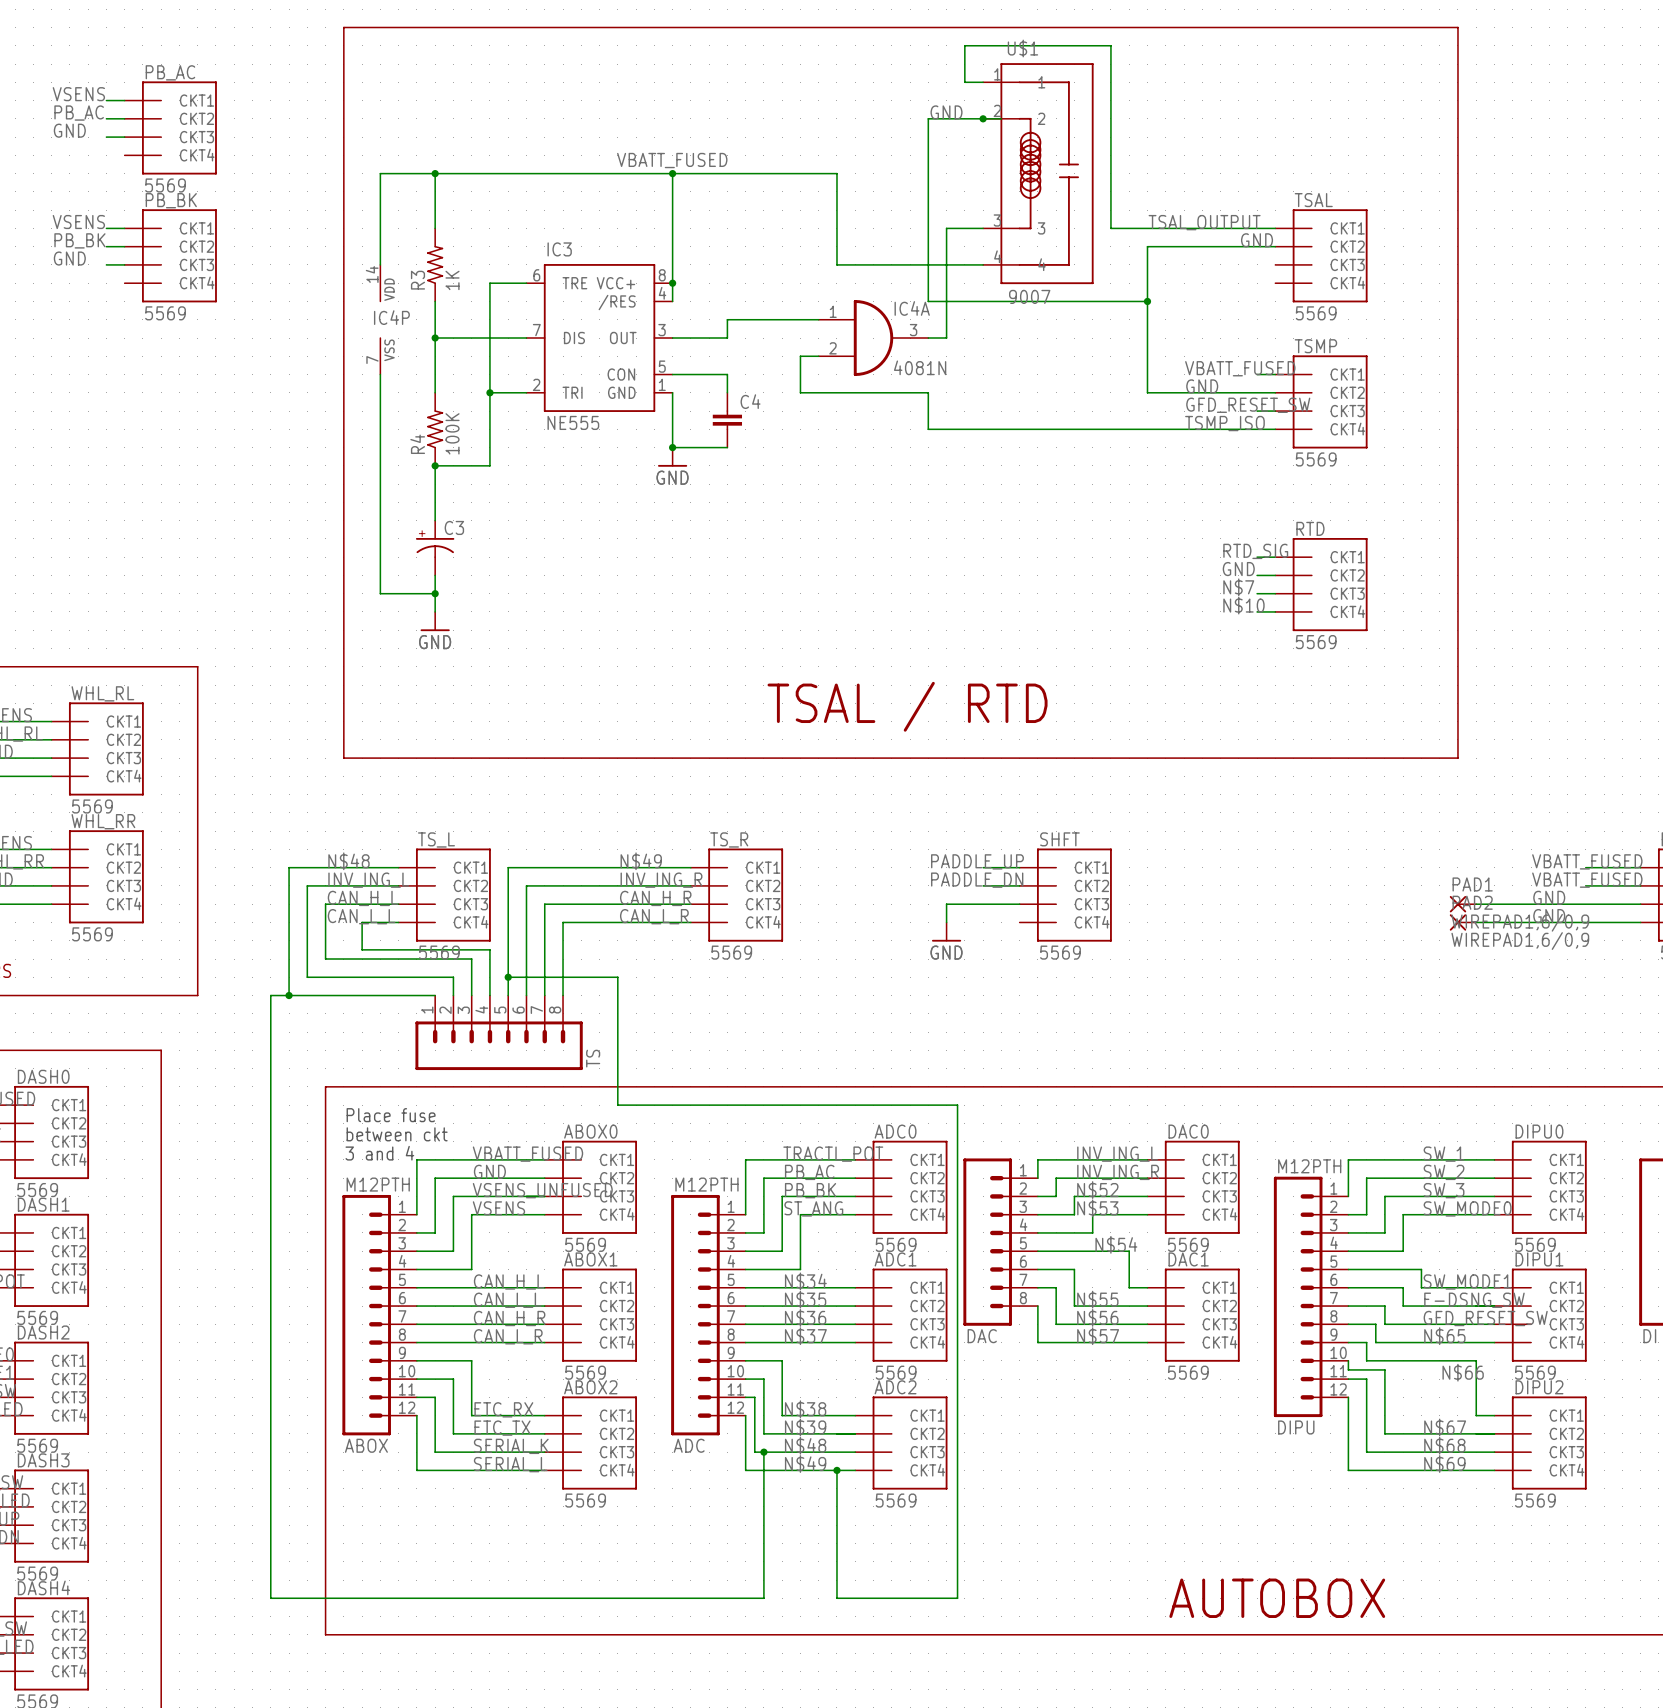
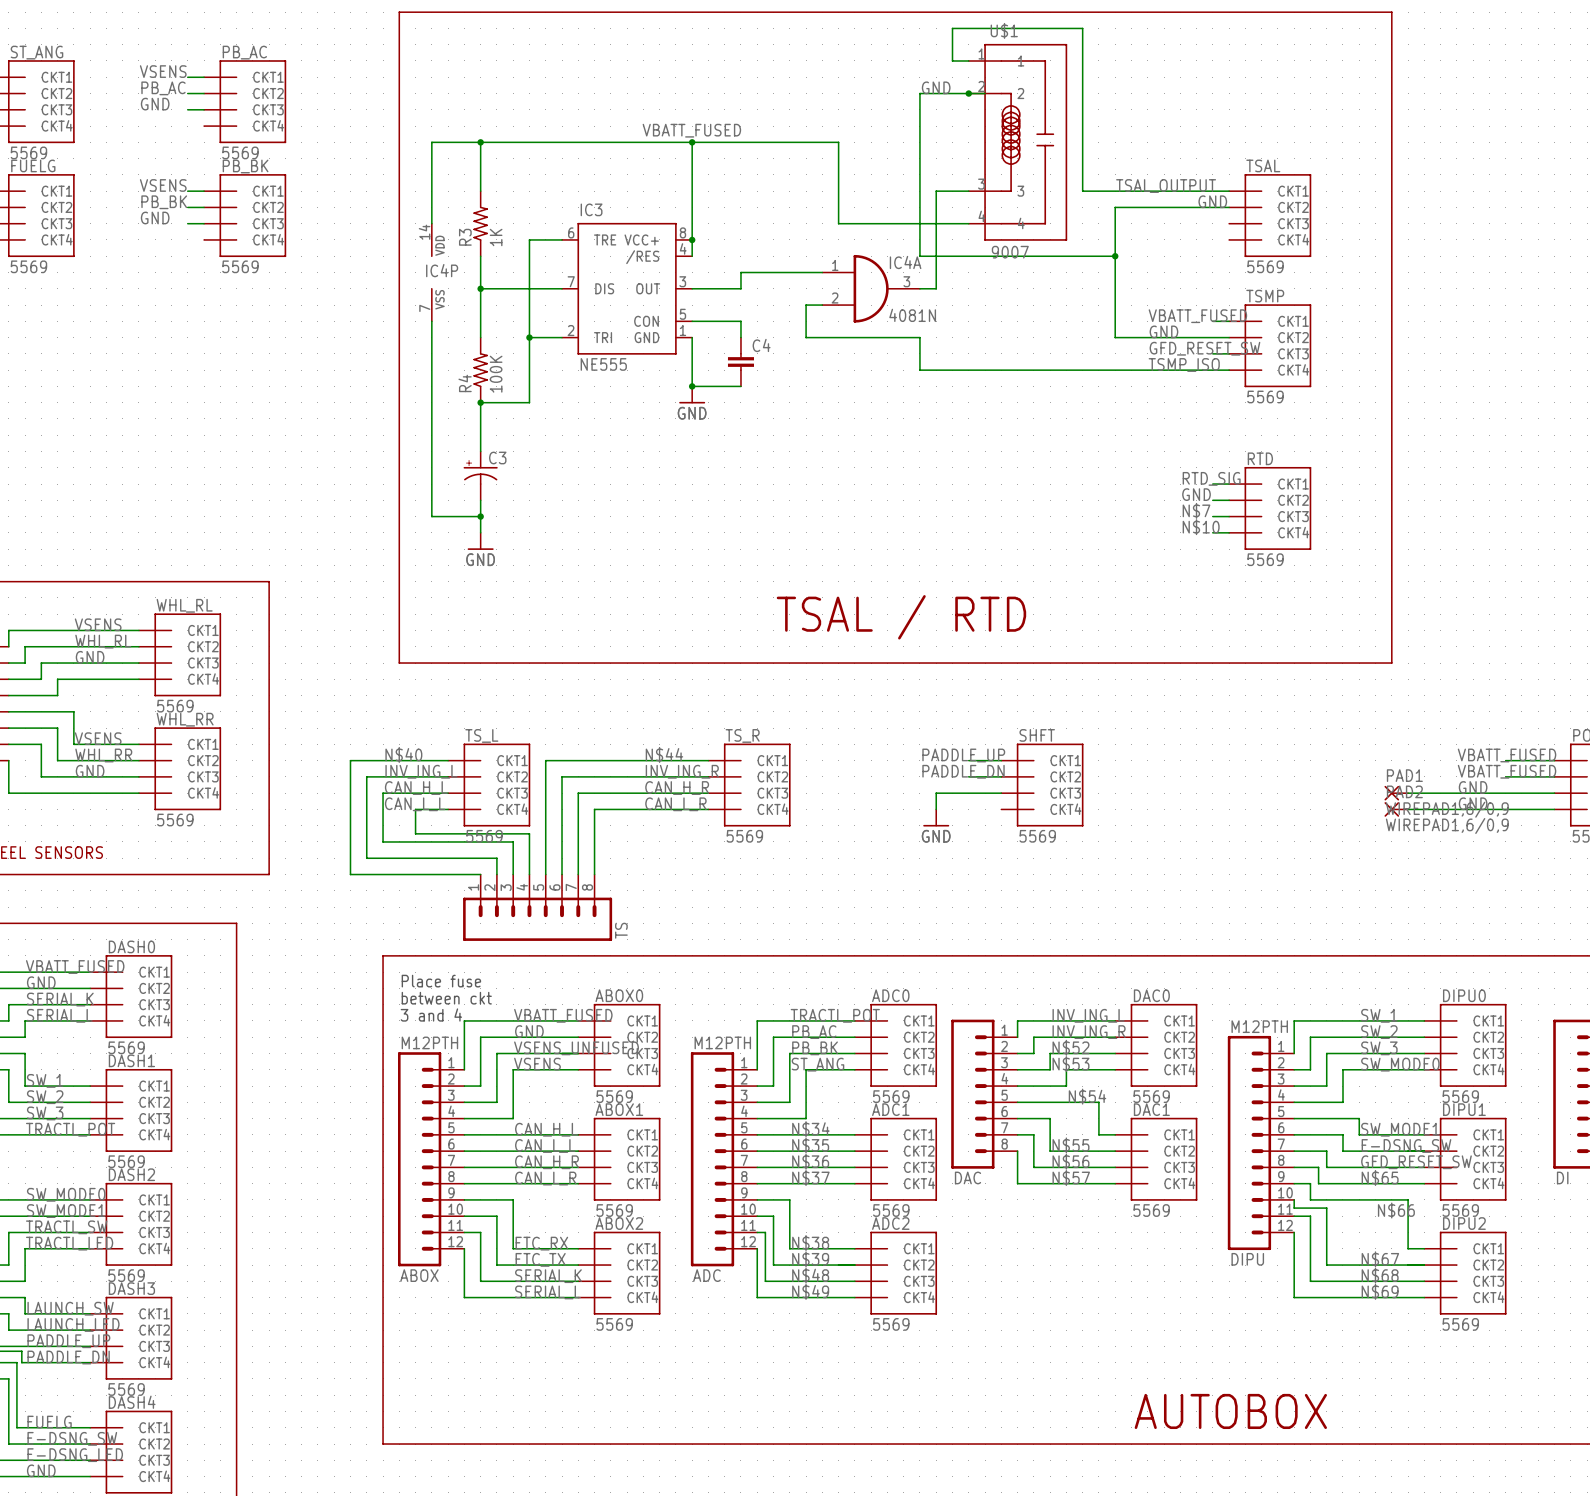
label: N$48 (348, 861) -> N$40 (403, 754)
label: N$49 (641, 861) -> N$44 (664, 754)
wire: (508, 977) (617, 977) (617, 1105) (957, 1105) (957, 1598) (836, 1598) (836, 1470) -> none
junction: (508, 977) -> none
wire: (289, 995) (270, 995) (270, 1598) (763, 1598) (763, 1452) -> none
junction: (289, 995) -> none
junction: (763, 1452) -> none
junction: (836, 1470) -> none

